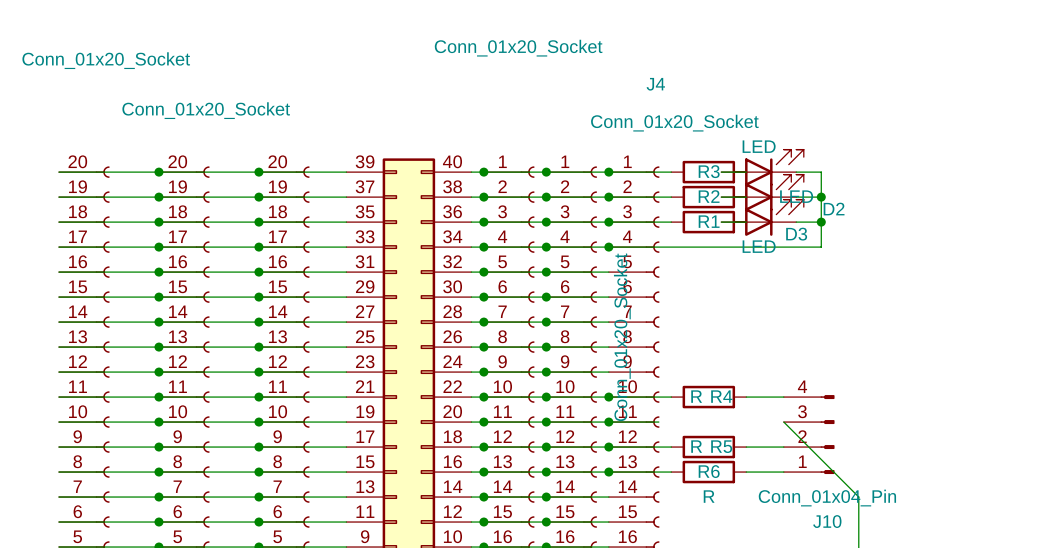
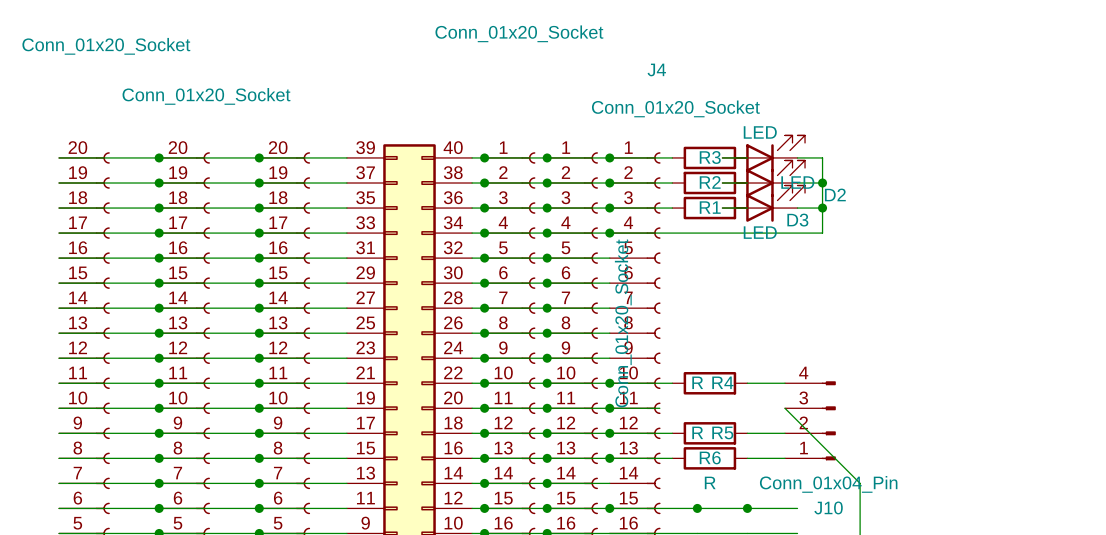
wire: none -> (609, 508) (797, 508)
junction: none -> (609, 508)
junction: none -> (697, 508)
junction: none -> (747, 508)
wire: none -> (609, 533) (797, 533)

